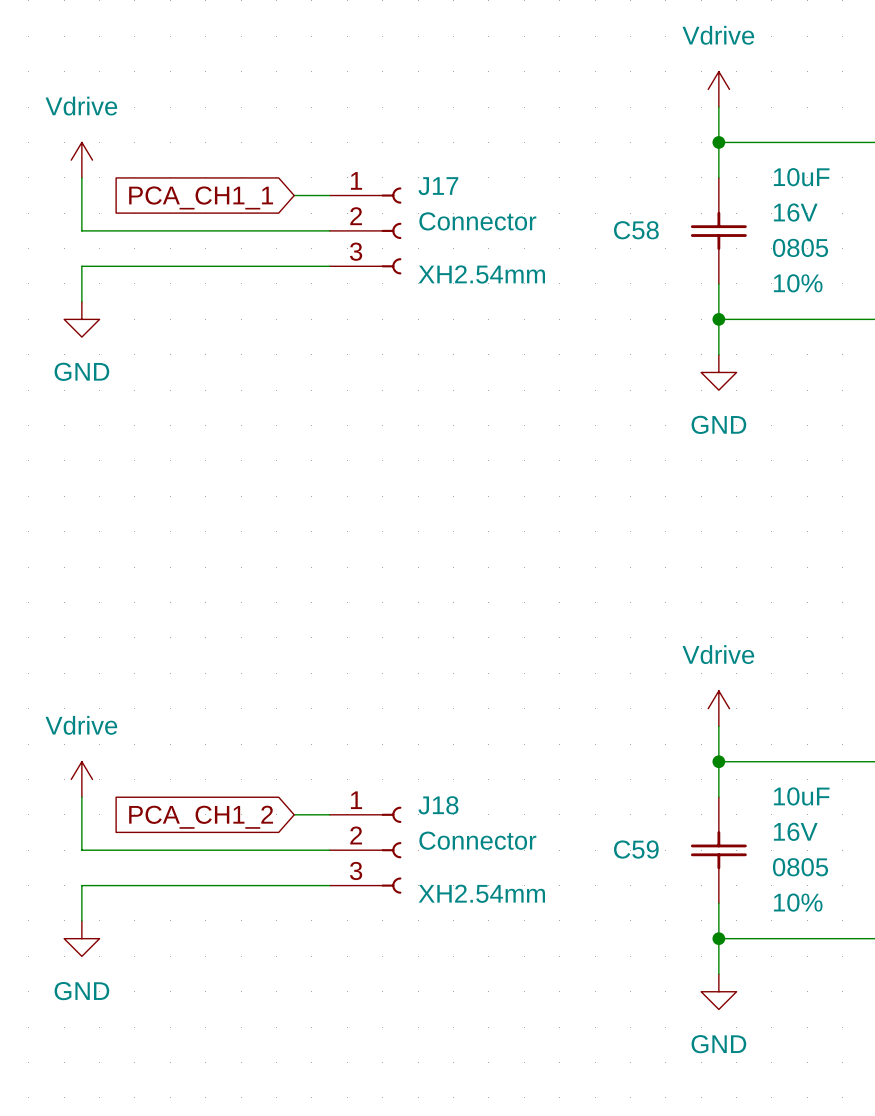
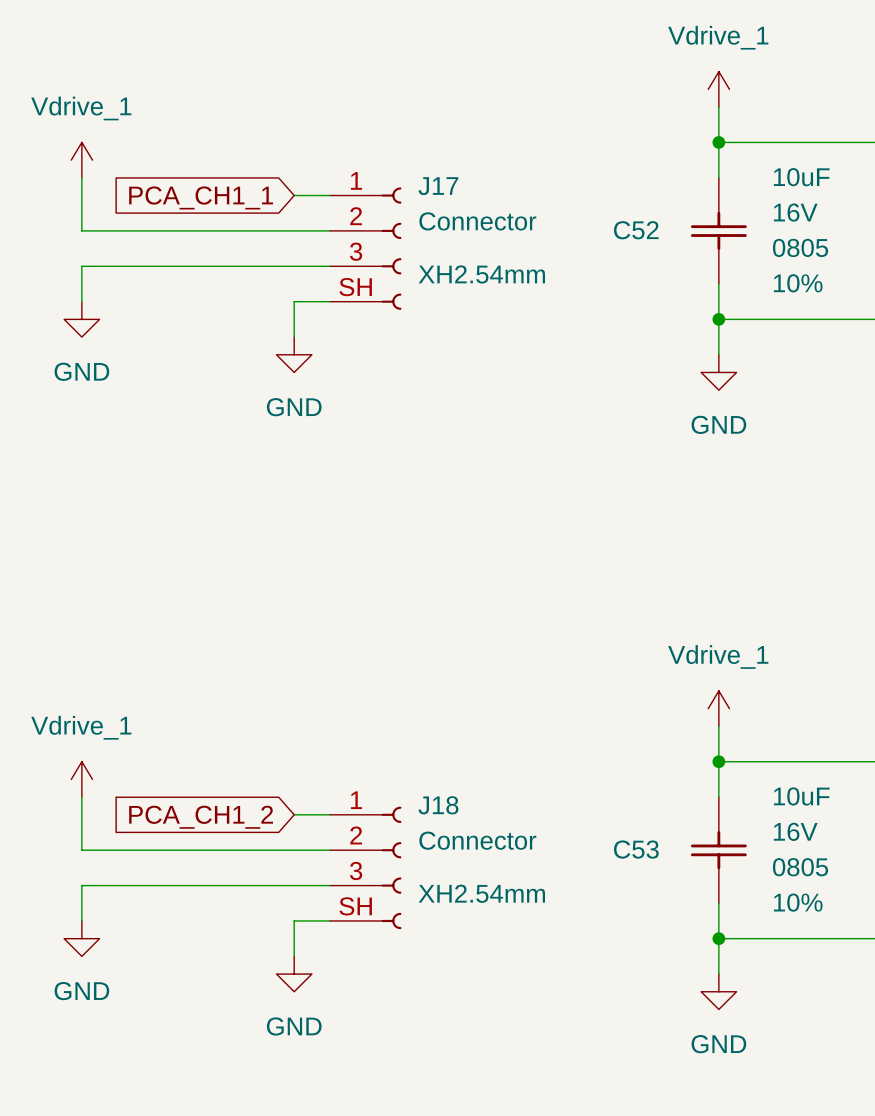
power symbol: Vdrive (718, 89) -> Vdrive_1 (718, 89)
power symbol: Vdrive (81, 160) -> Vdrive_1 (81, 160)
J17 symbol: [329, 187, 402, 275] -> [329, 187, 402, 310]
C58 name: C58 (636, 230) -> C52 (636, 230)
wire: none -> (329, 301) (294, 301) (294, 337)
power symbol: none -> GND (294, 354)
power symbol: Vdrive (718, 708) -> Vdrive_1 (718, 708)
power symbol: Vdrive (81, 779) -> Vdrive_1 (81, 779)
J18 symbol: [329, 806, 402, 894] -> [329, 806, 402, 930]
C59 name: C59 (636, 849) -> C53 (636, 849)
wire: none -> (329, 920) (294, 920) (294, 956)
power symbol: none -> GND (294, 974)

